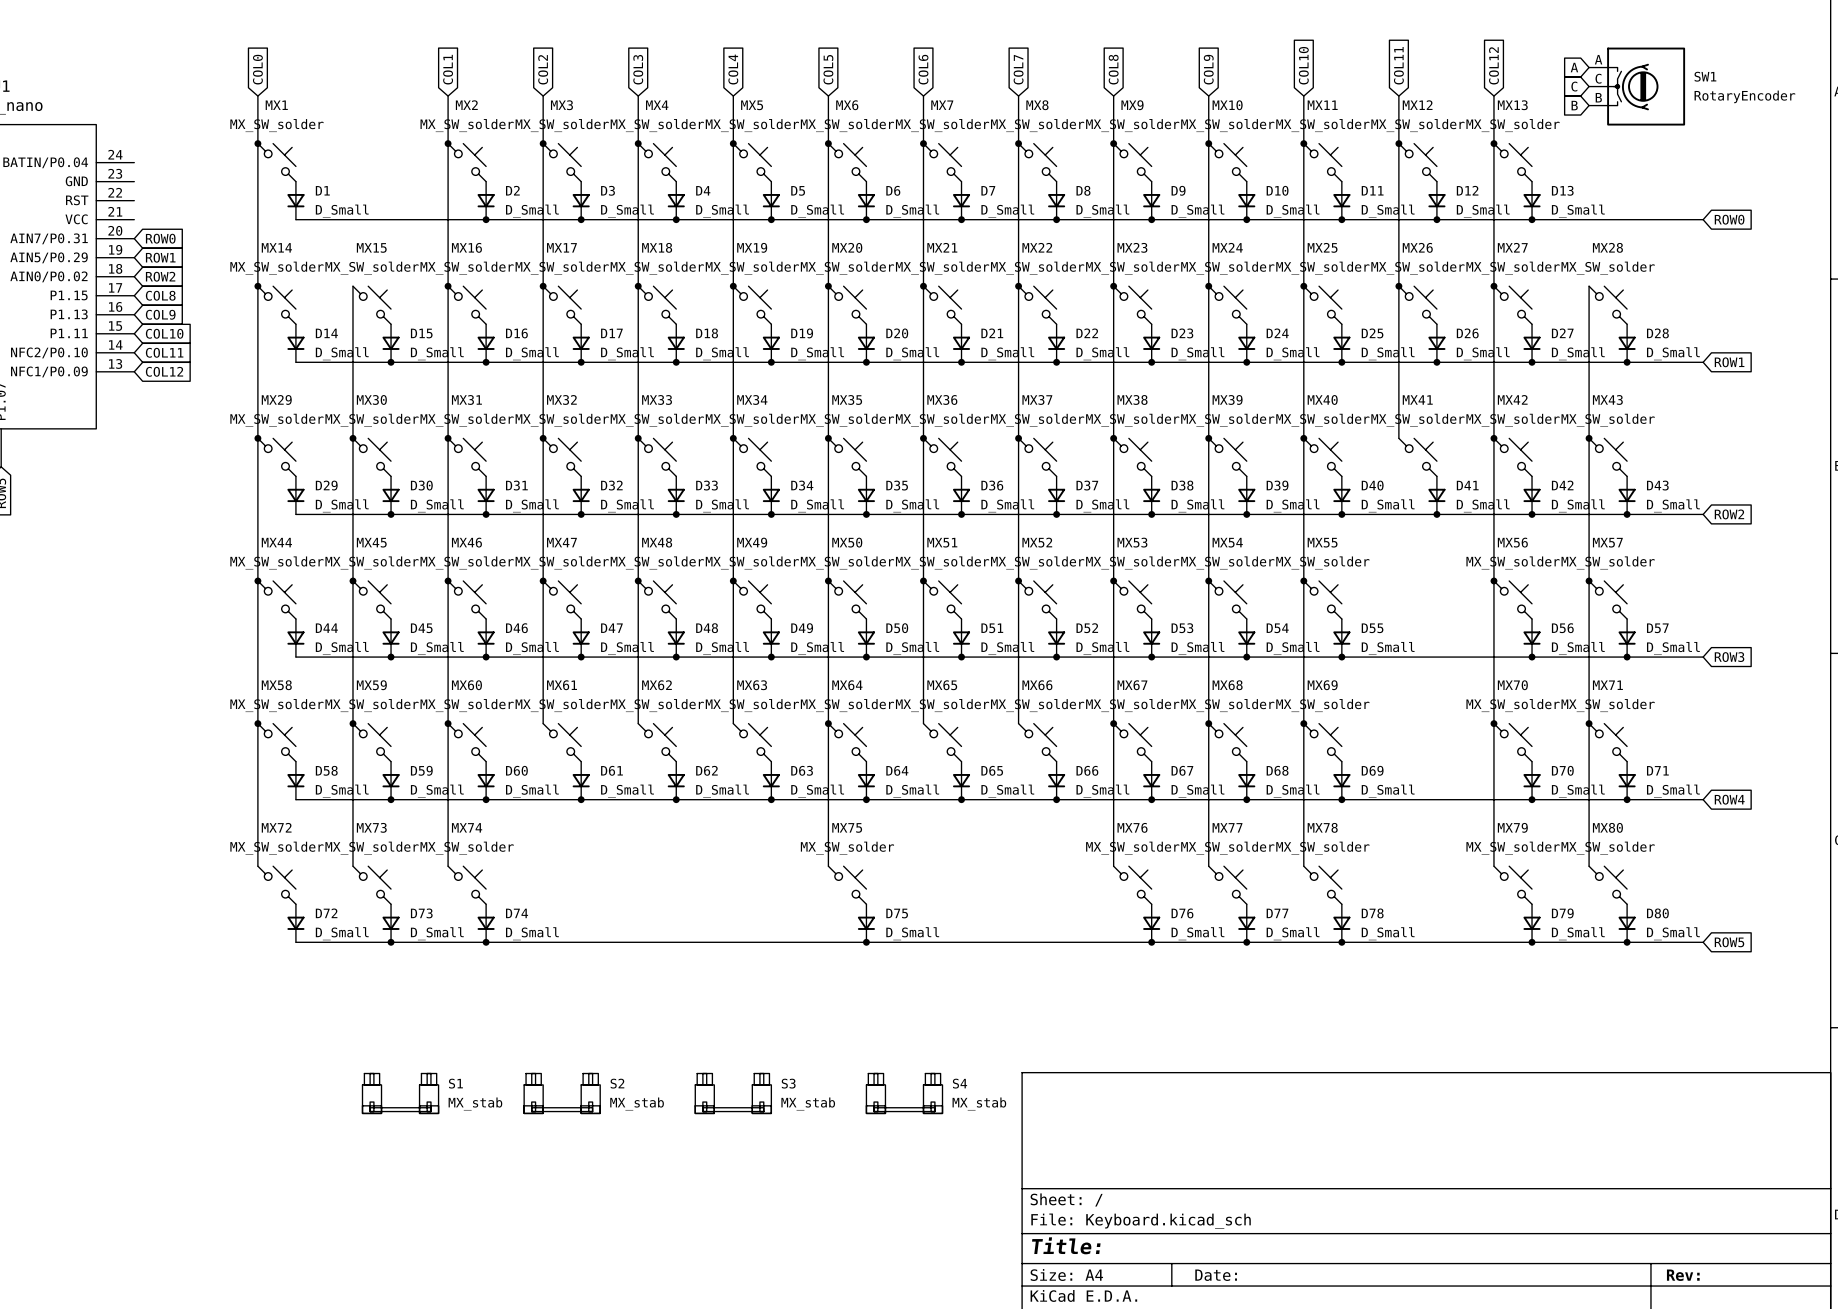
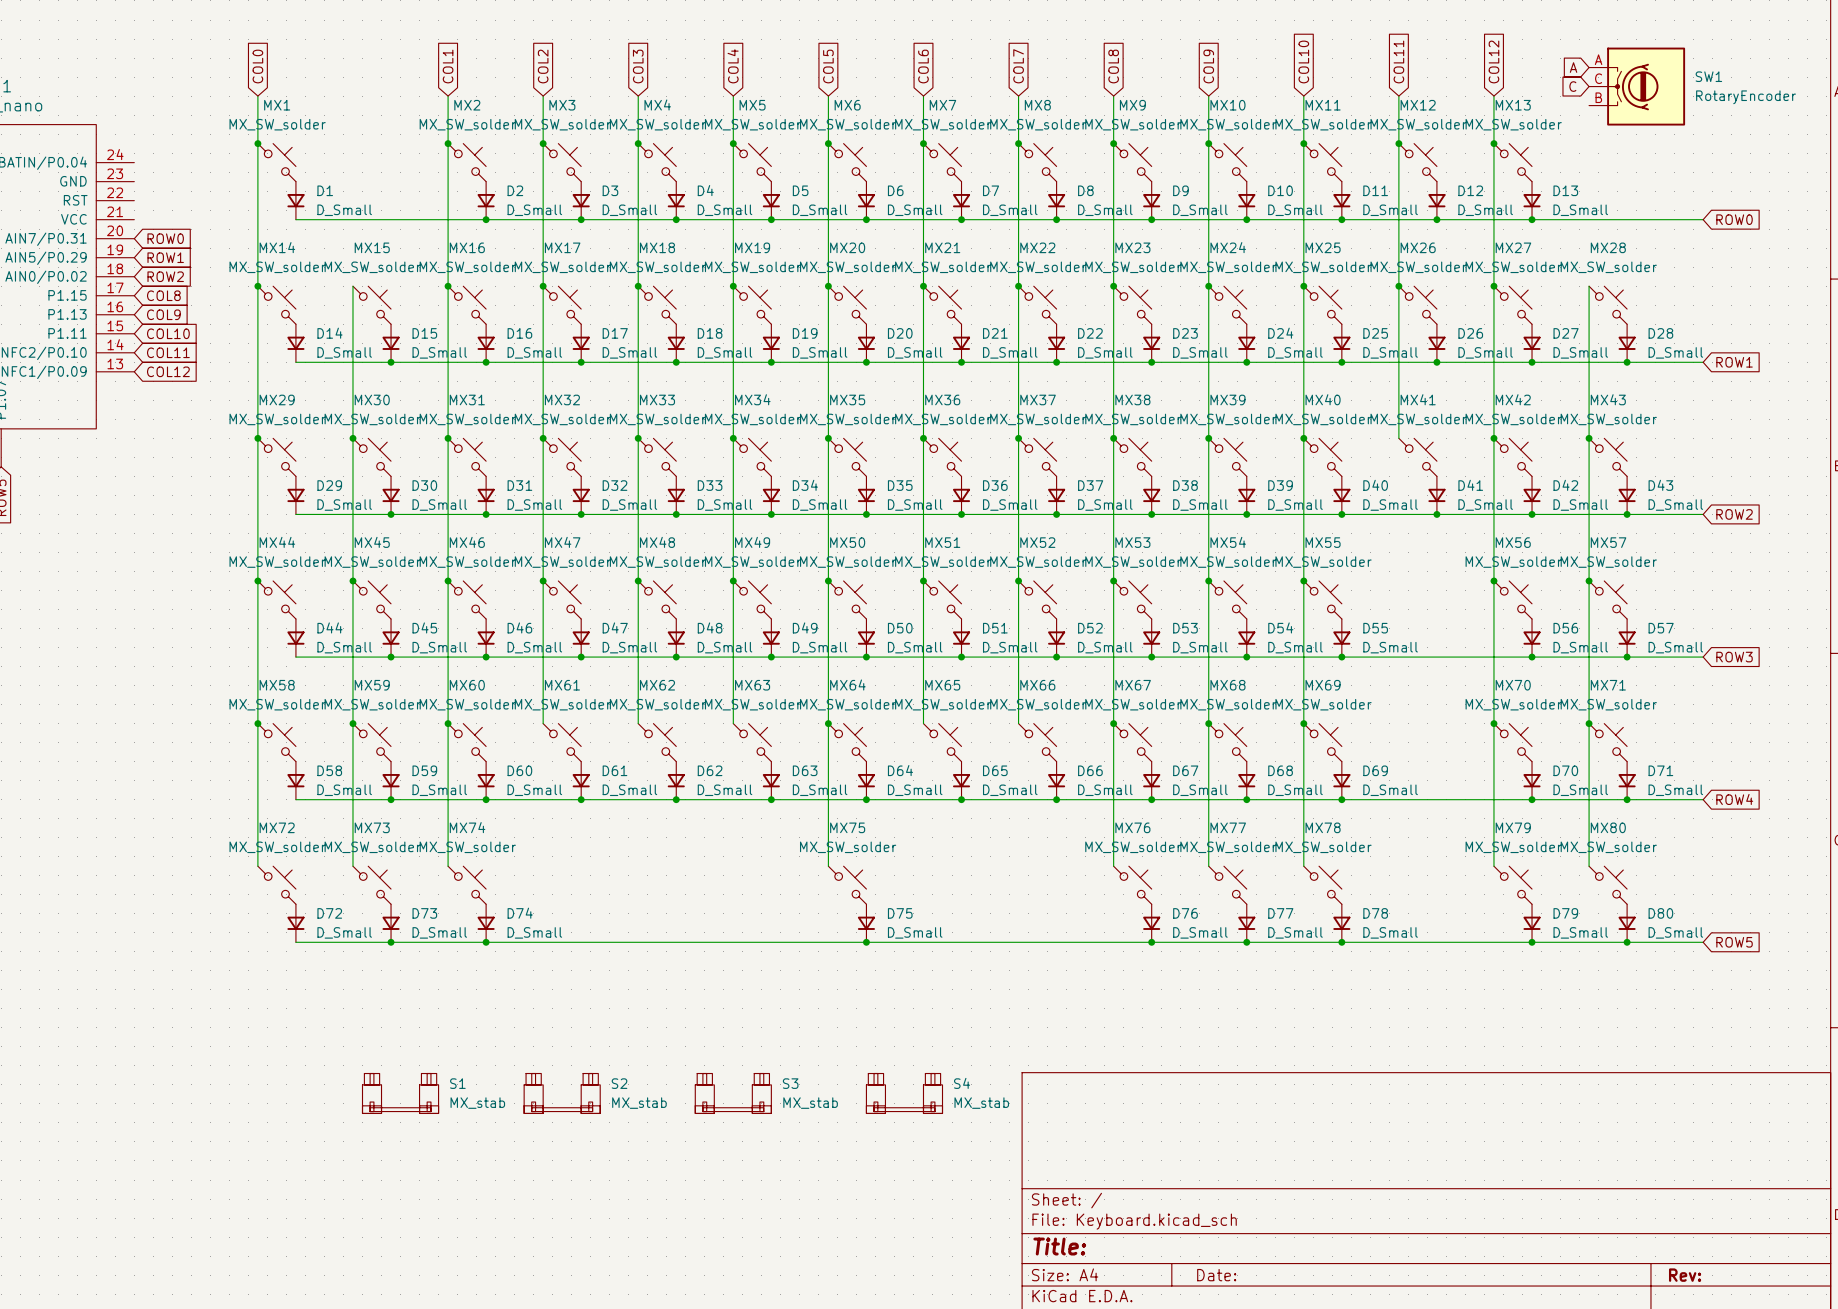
global label: B (1574, 105) -> none

